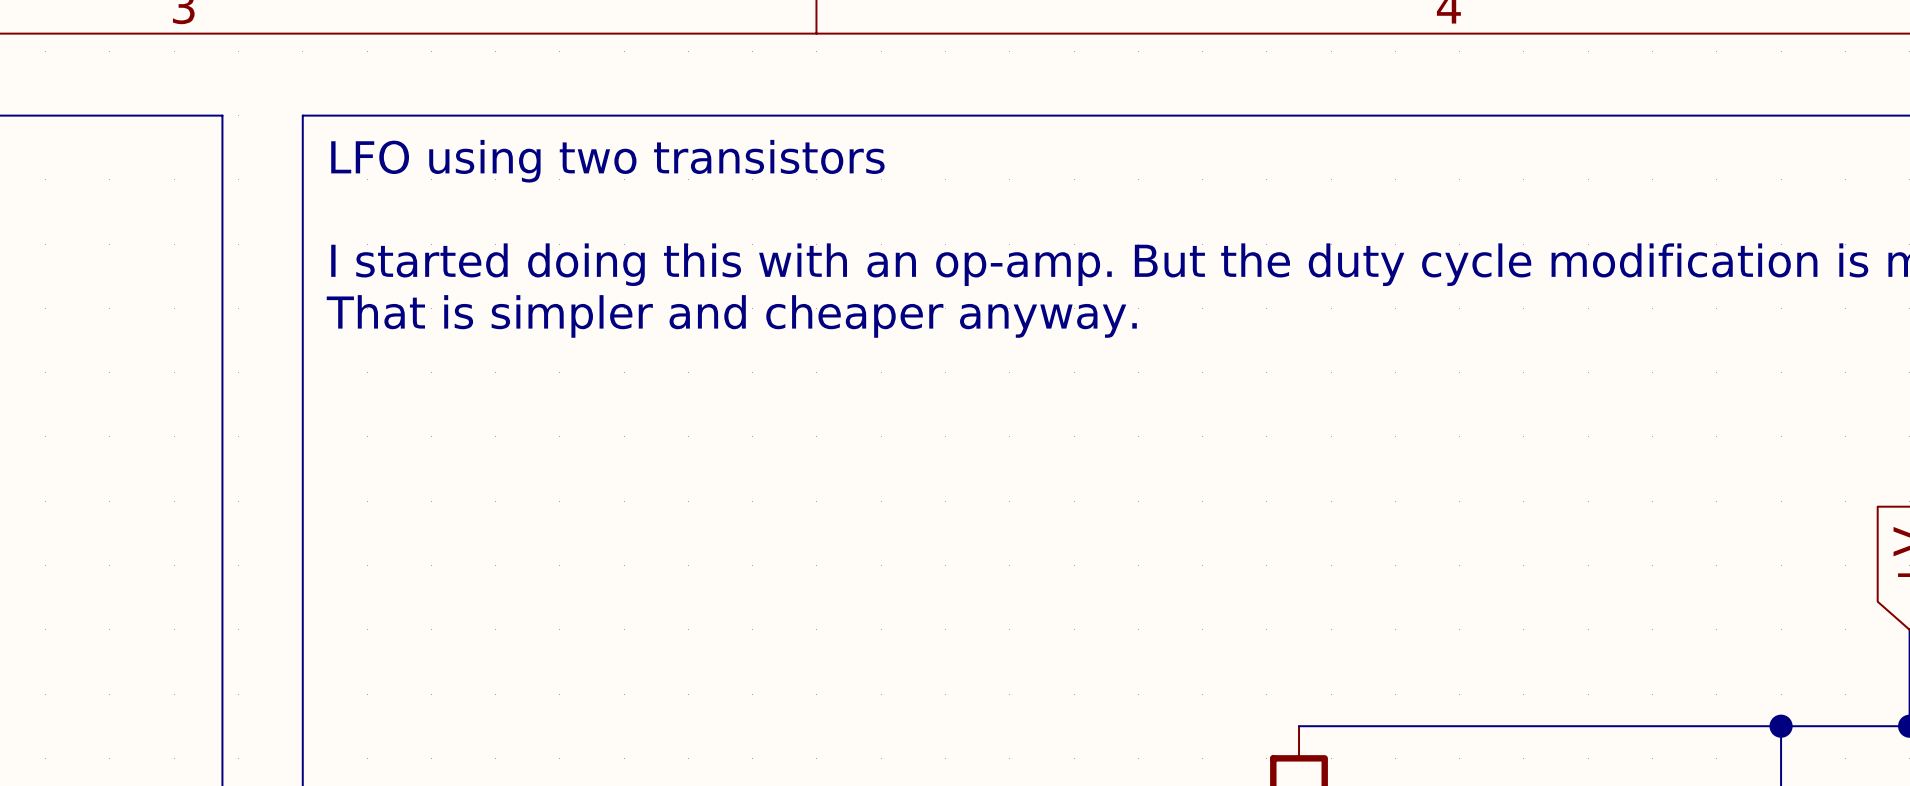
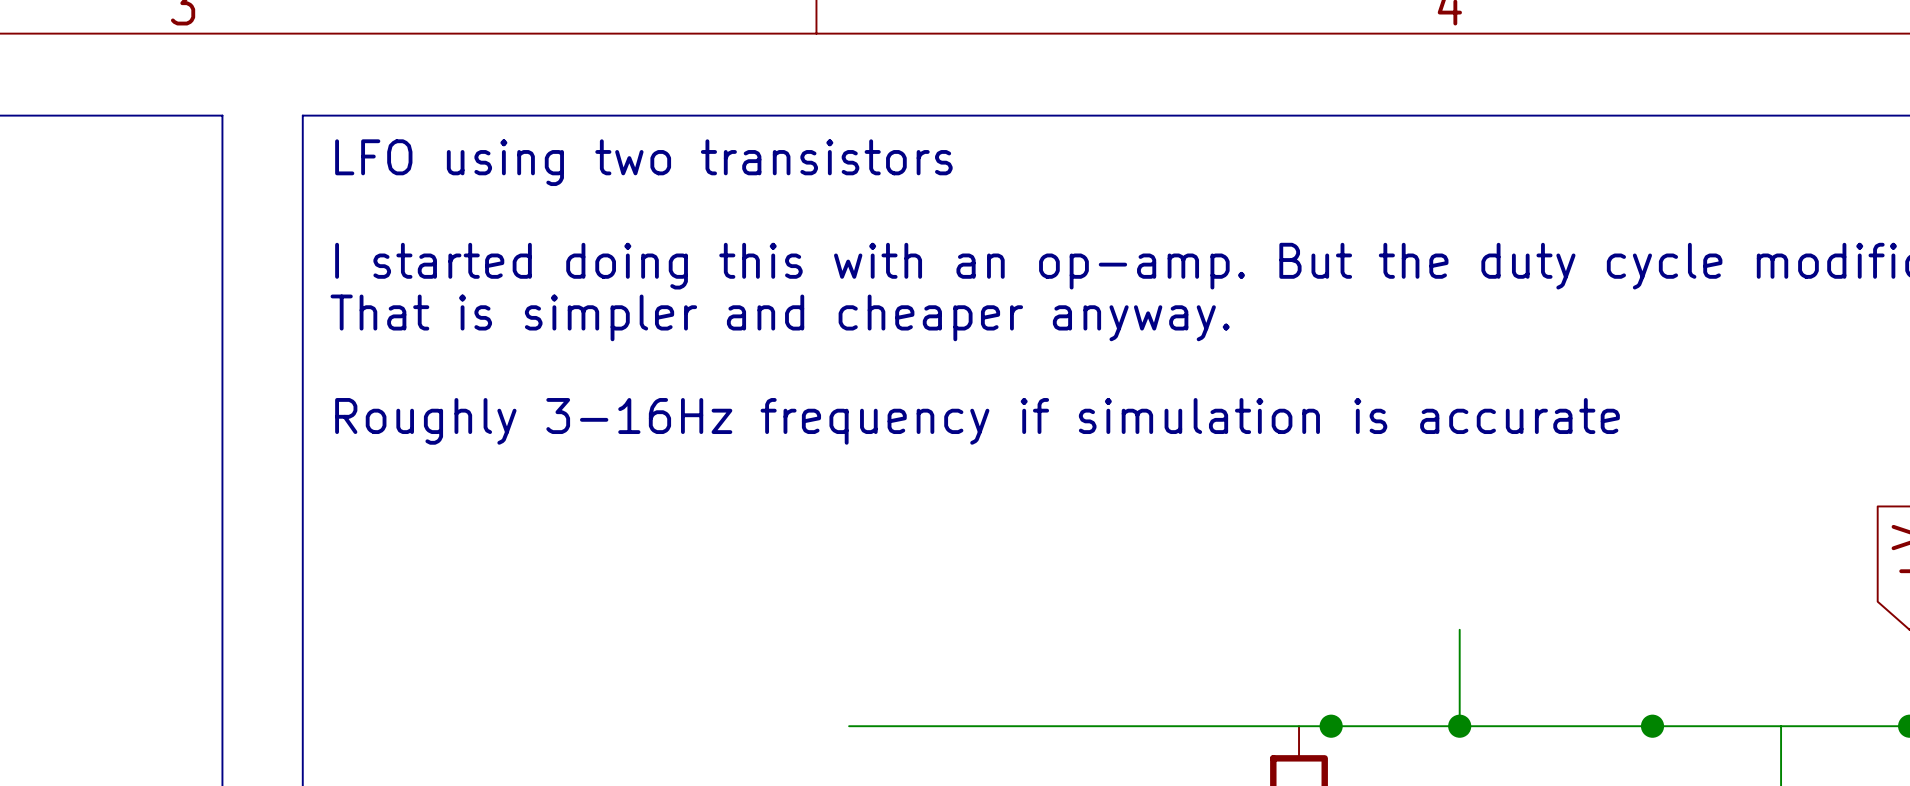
text: none -> Roughly 3-16Hz frequency if simulation is accurate (977, 421)
wire: (1909, 629) (1909, 726) -> (1459, 629) (1459, 726)
wire: none -> (849, 726) (1299, 726)
junction: none -> (1331, 726)
junction: none -> (1459, 726)
junction position: (1781, 726) -> (1652, 726)

